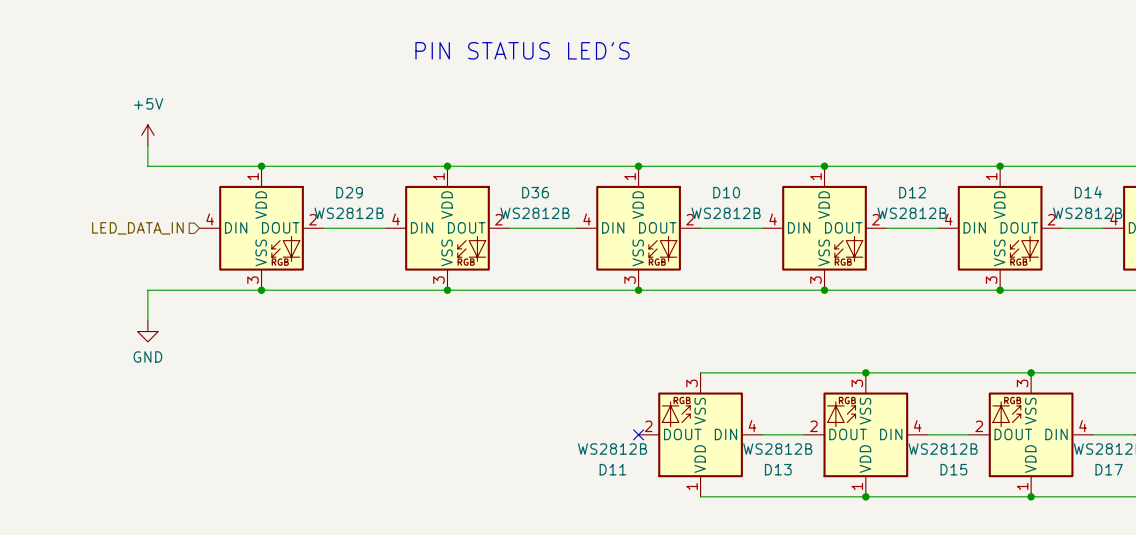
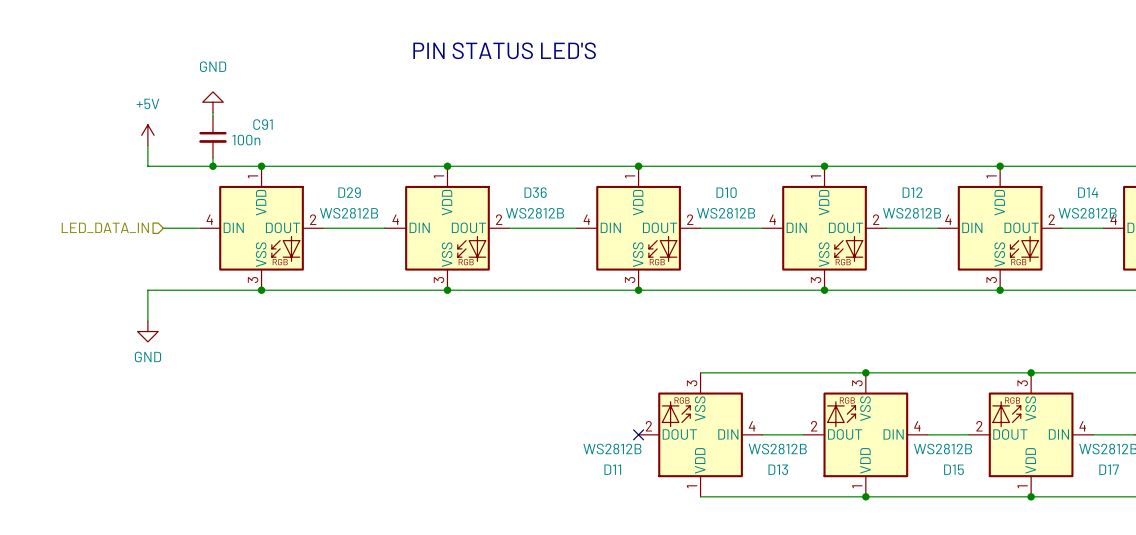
power symbol: none -> GND (212, 102)
wire: none -> (212, 112) (212, 116)
C91: none -> 100n (212, 137)
wire: none -> (212, 158) (212, 166)
junction: none -> (212, 166)
hierarchical label position: LED_DATA_IN (137, 228) -> LED_DATA_IN (105, 227)
wire: none -> (163, 228) (198, 228)

